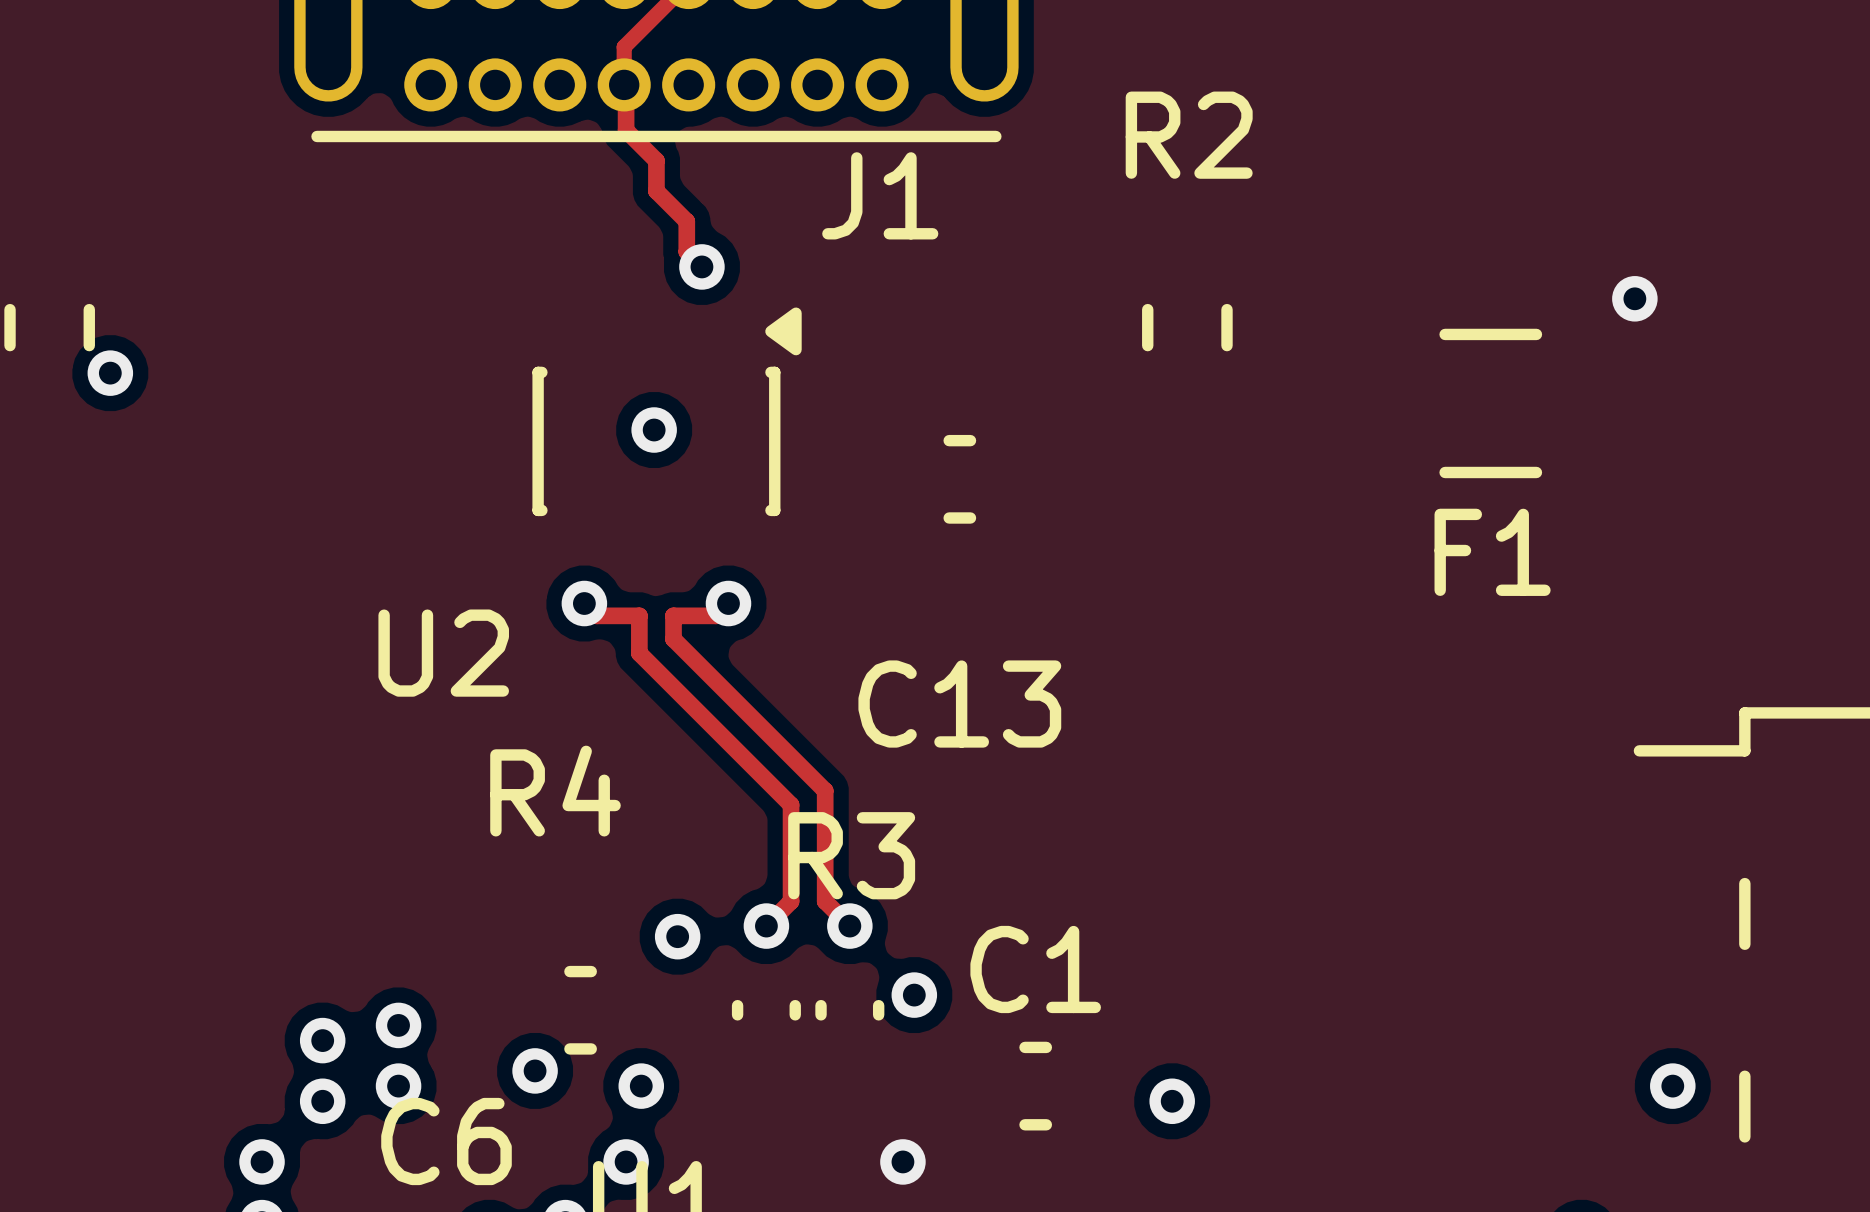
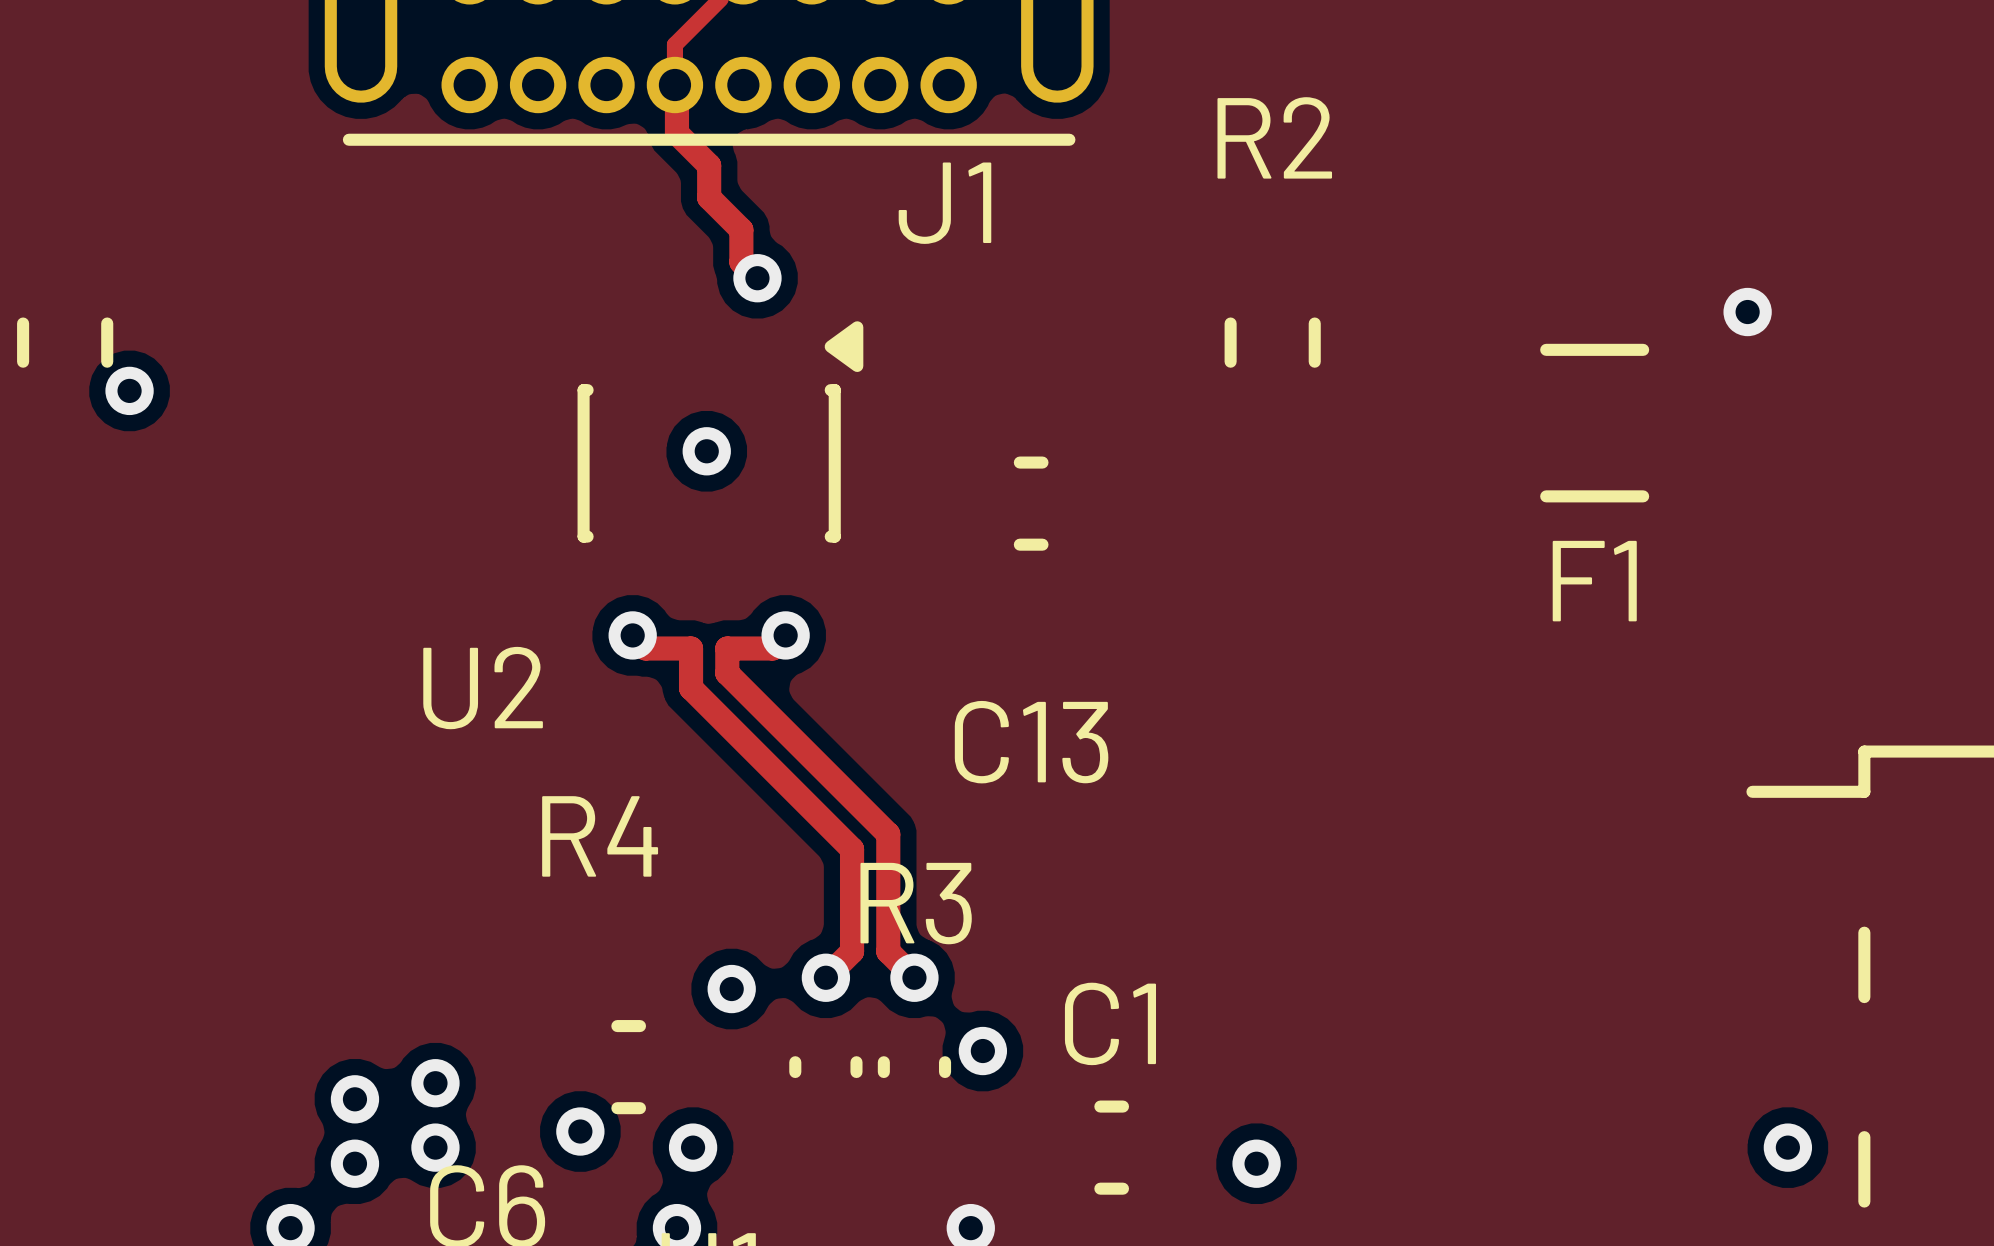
track width: thin (624, 84) (626, 86) (626, 130) (656, 160) (656, 191) (686, 221) (686, 251) (701, 266) -> thick (674, 85) (676, 87) (676, 133) (709, 165) (709, 197) (741, 229) (741, 262) (757, 278)
track width: thin (584, 603) (596, 615) (639, 615) (639, 653) (791, 804) (791, 901) (766, 926) -> thick (632, 635) (645, 648) (691, 648) (691, 688) (852, 849) (852, 951) (825, 977)
track width: thin (728, 603) (716, 615) (673, 615) (673, 639) (825, 790) (825, 901) (849, 926) -> thick (785, 635) (772, 648) (727, 648) (727, 673) (888, 834) (888, 951) (914, 977)

